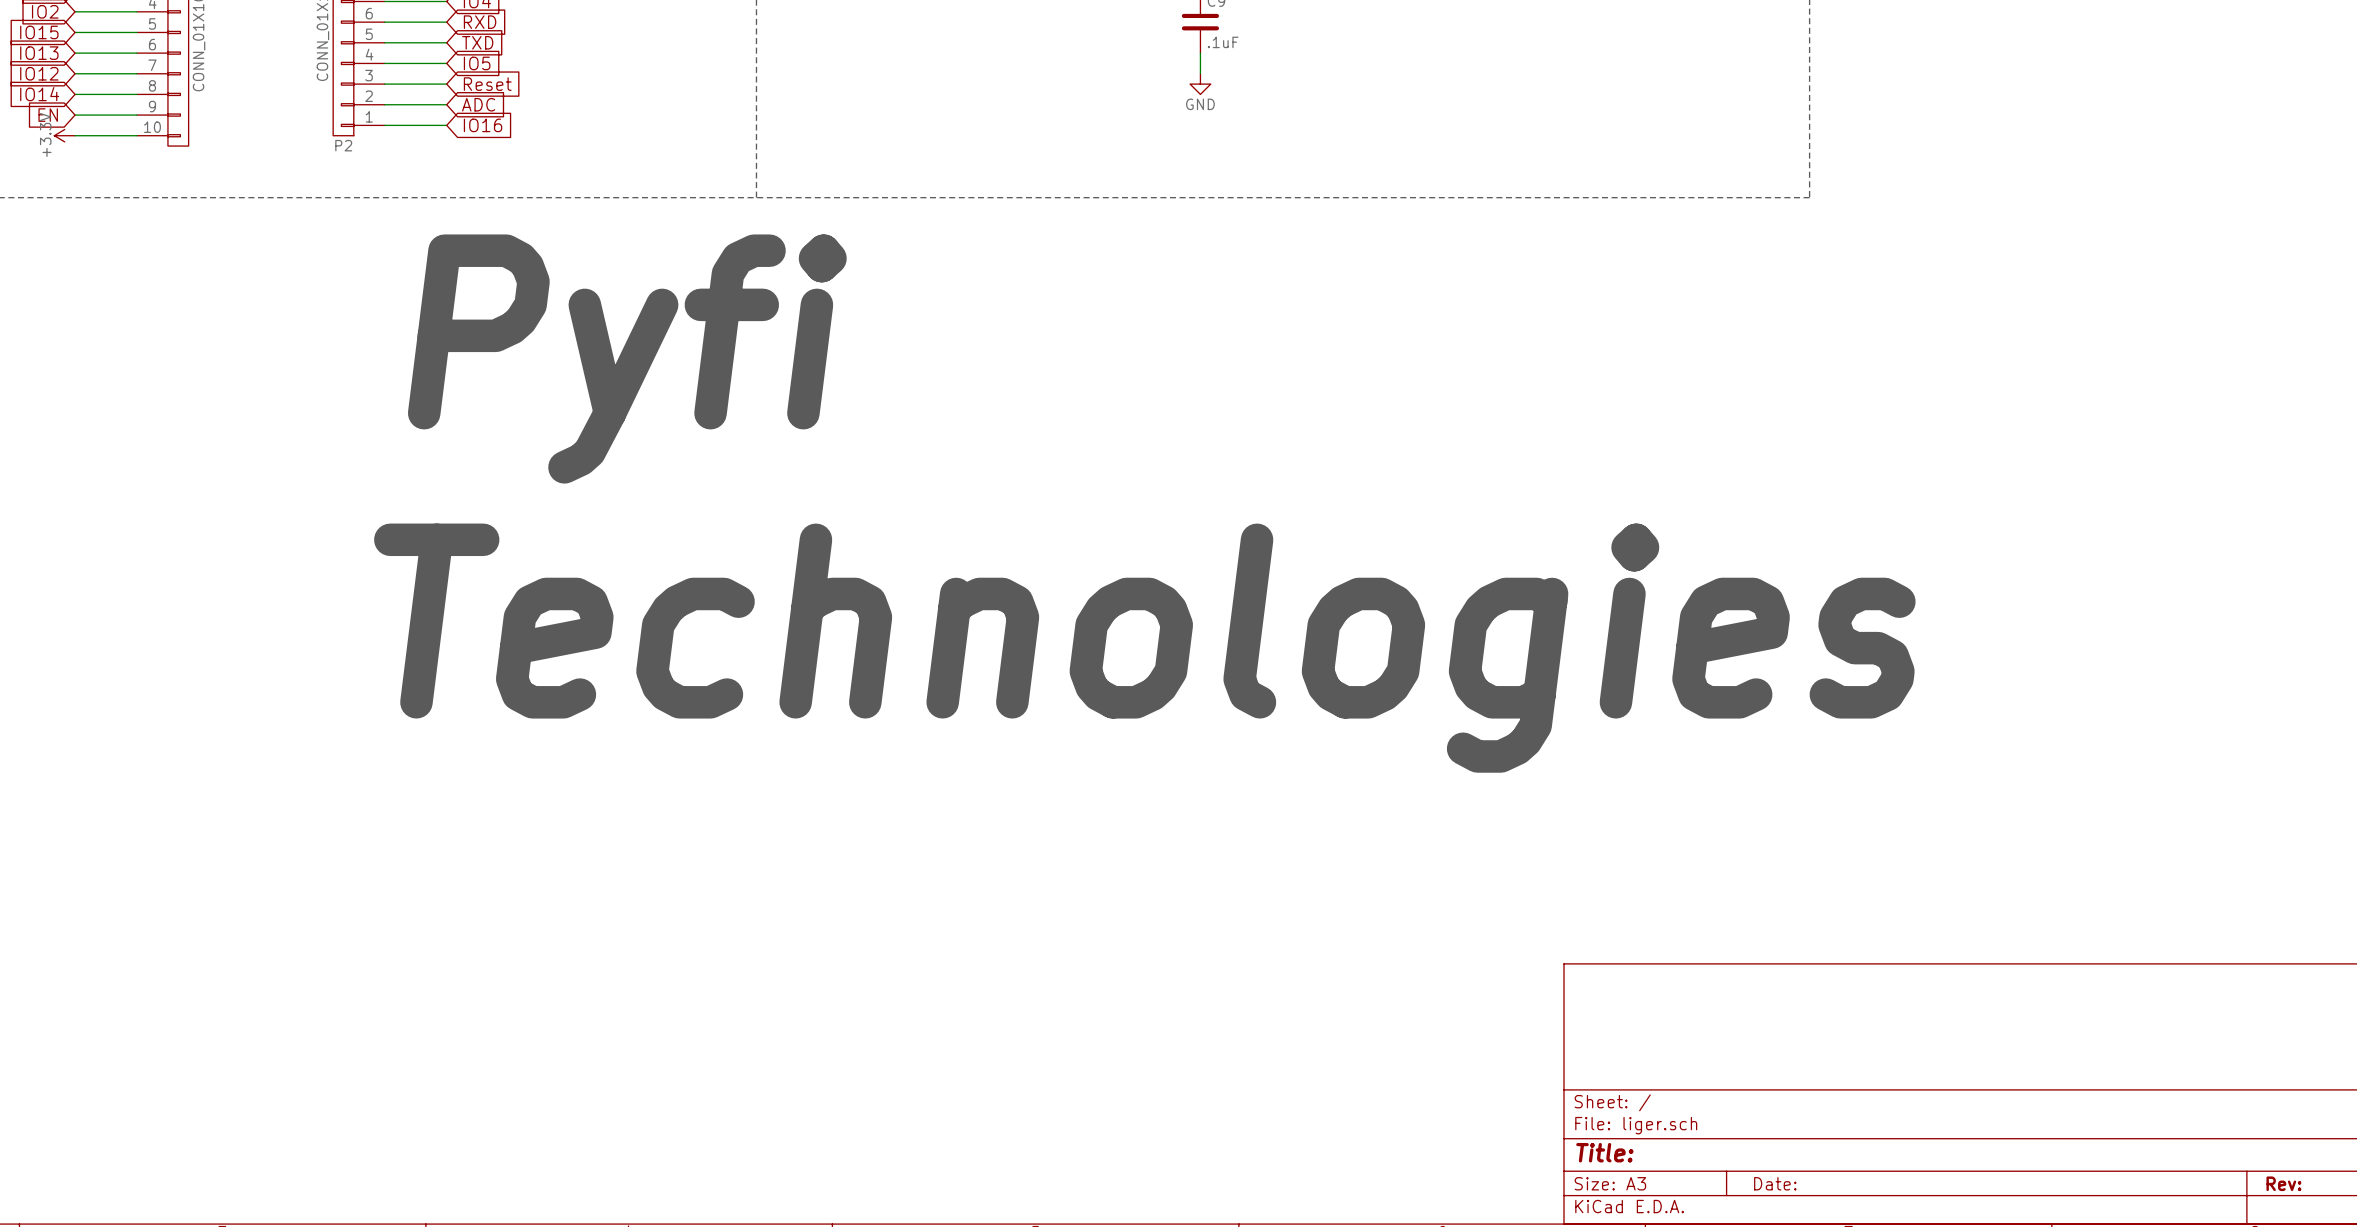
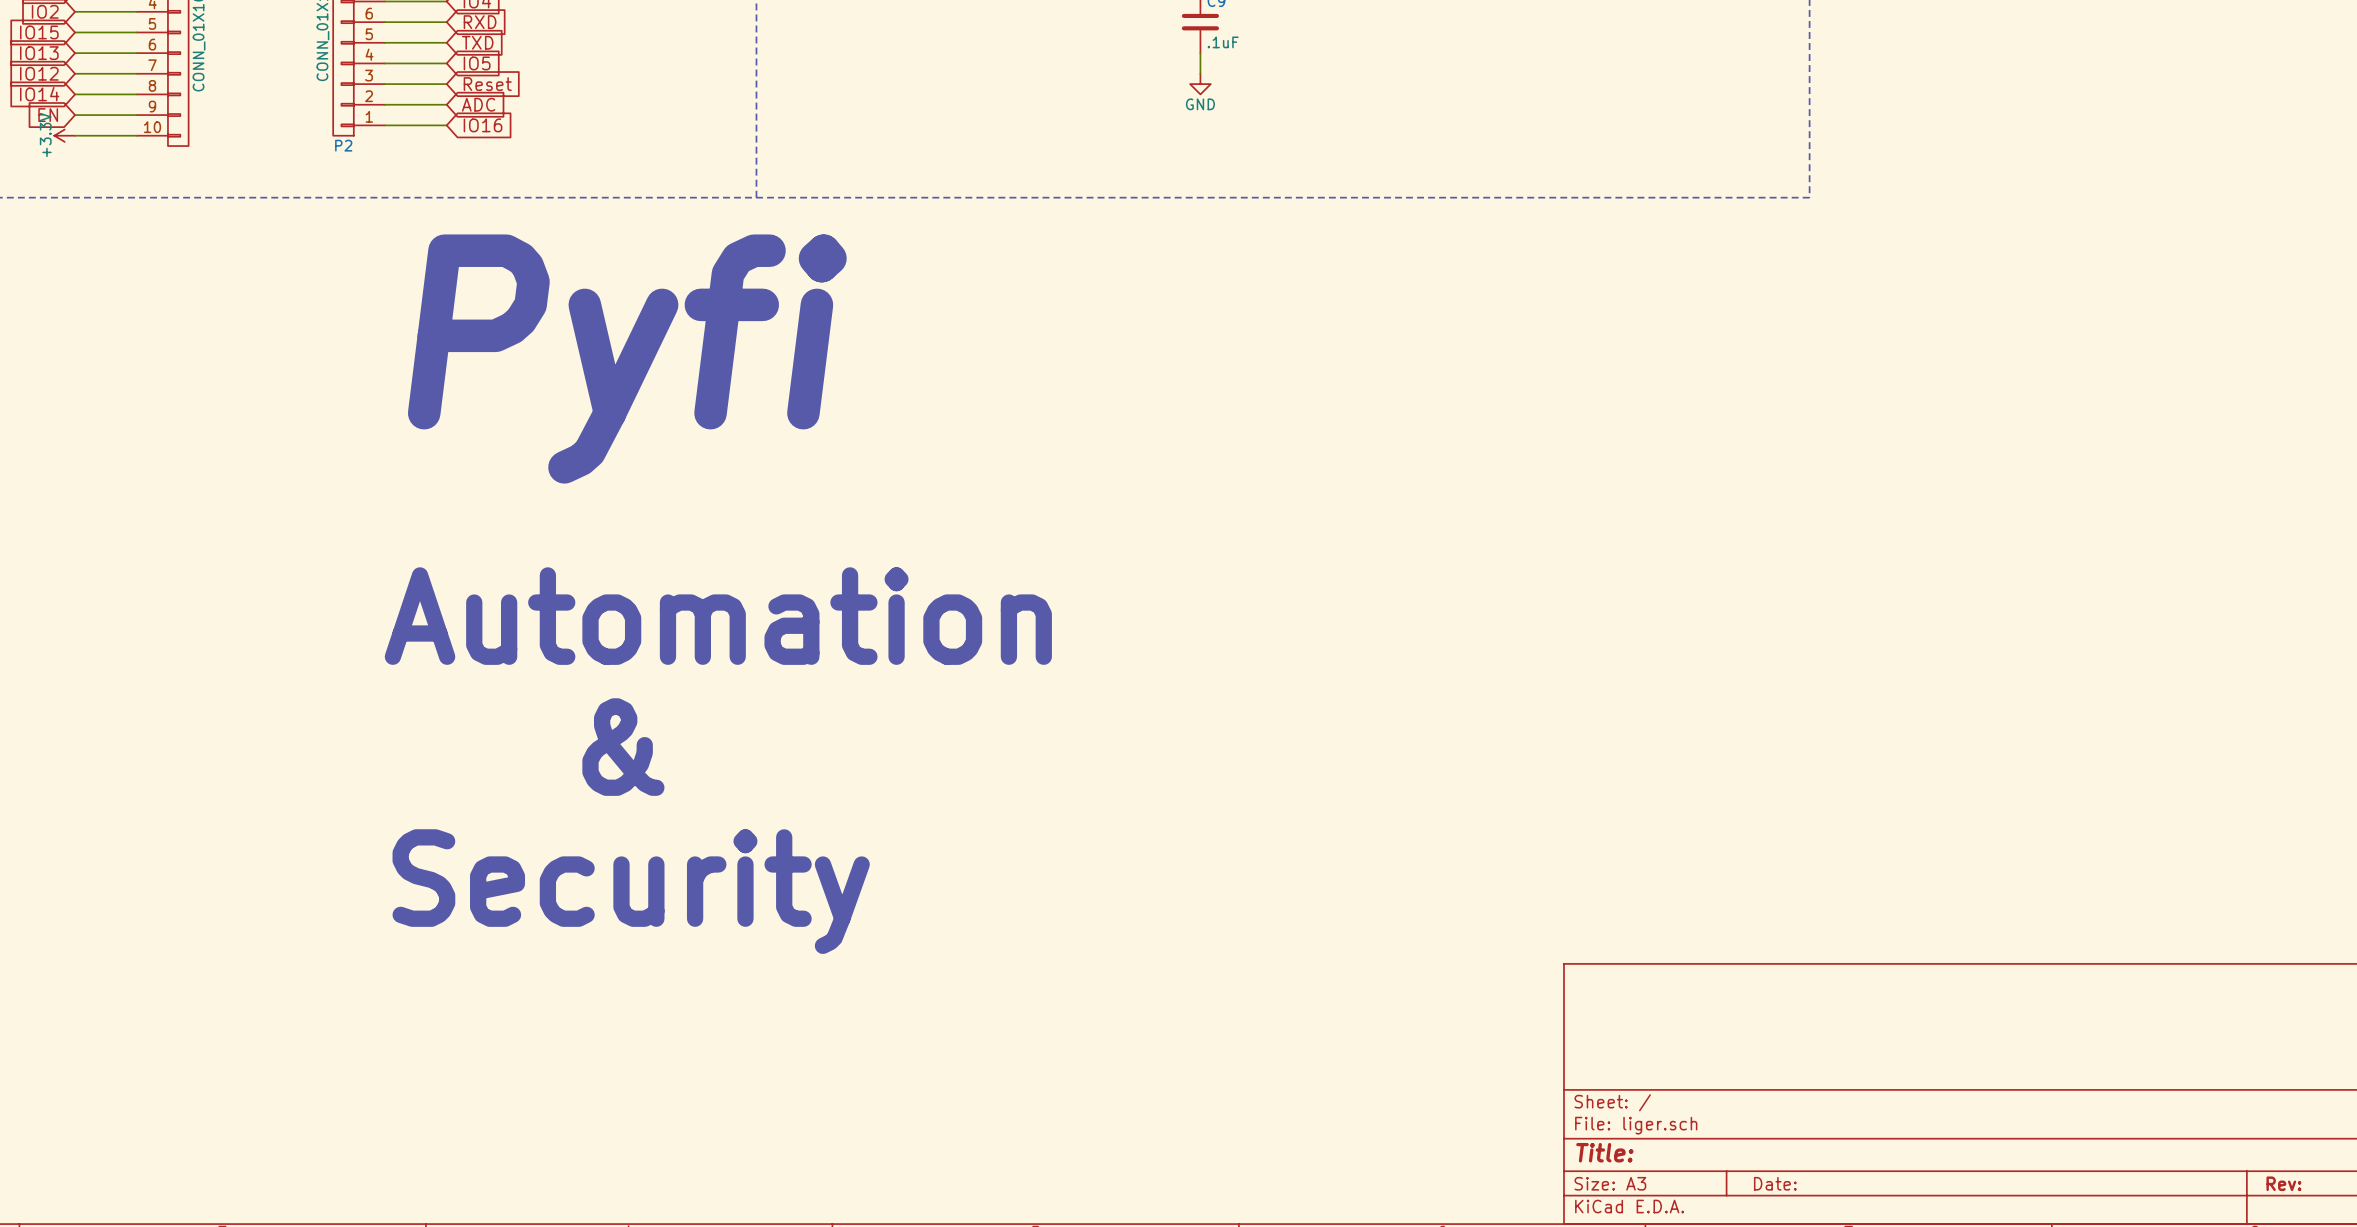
text: none -> Automation (718, 616)
text: Technologies (1144, 648) -> none
text: none -> & (623, 747)
text: none -> Security (631, 891)

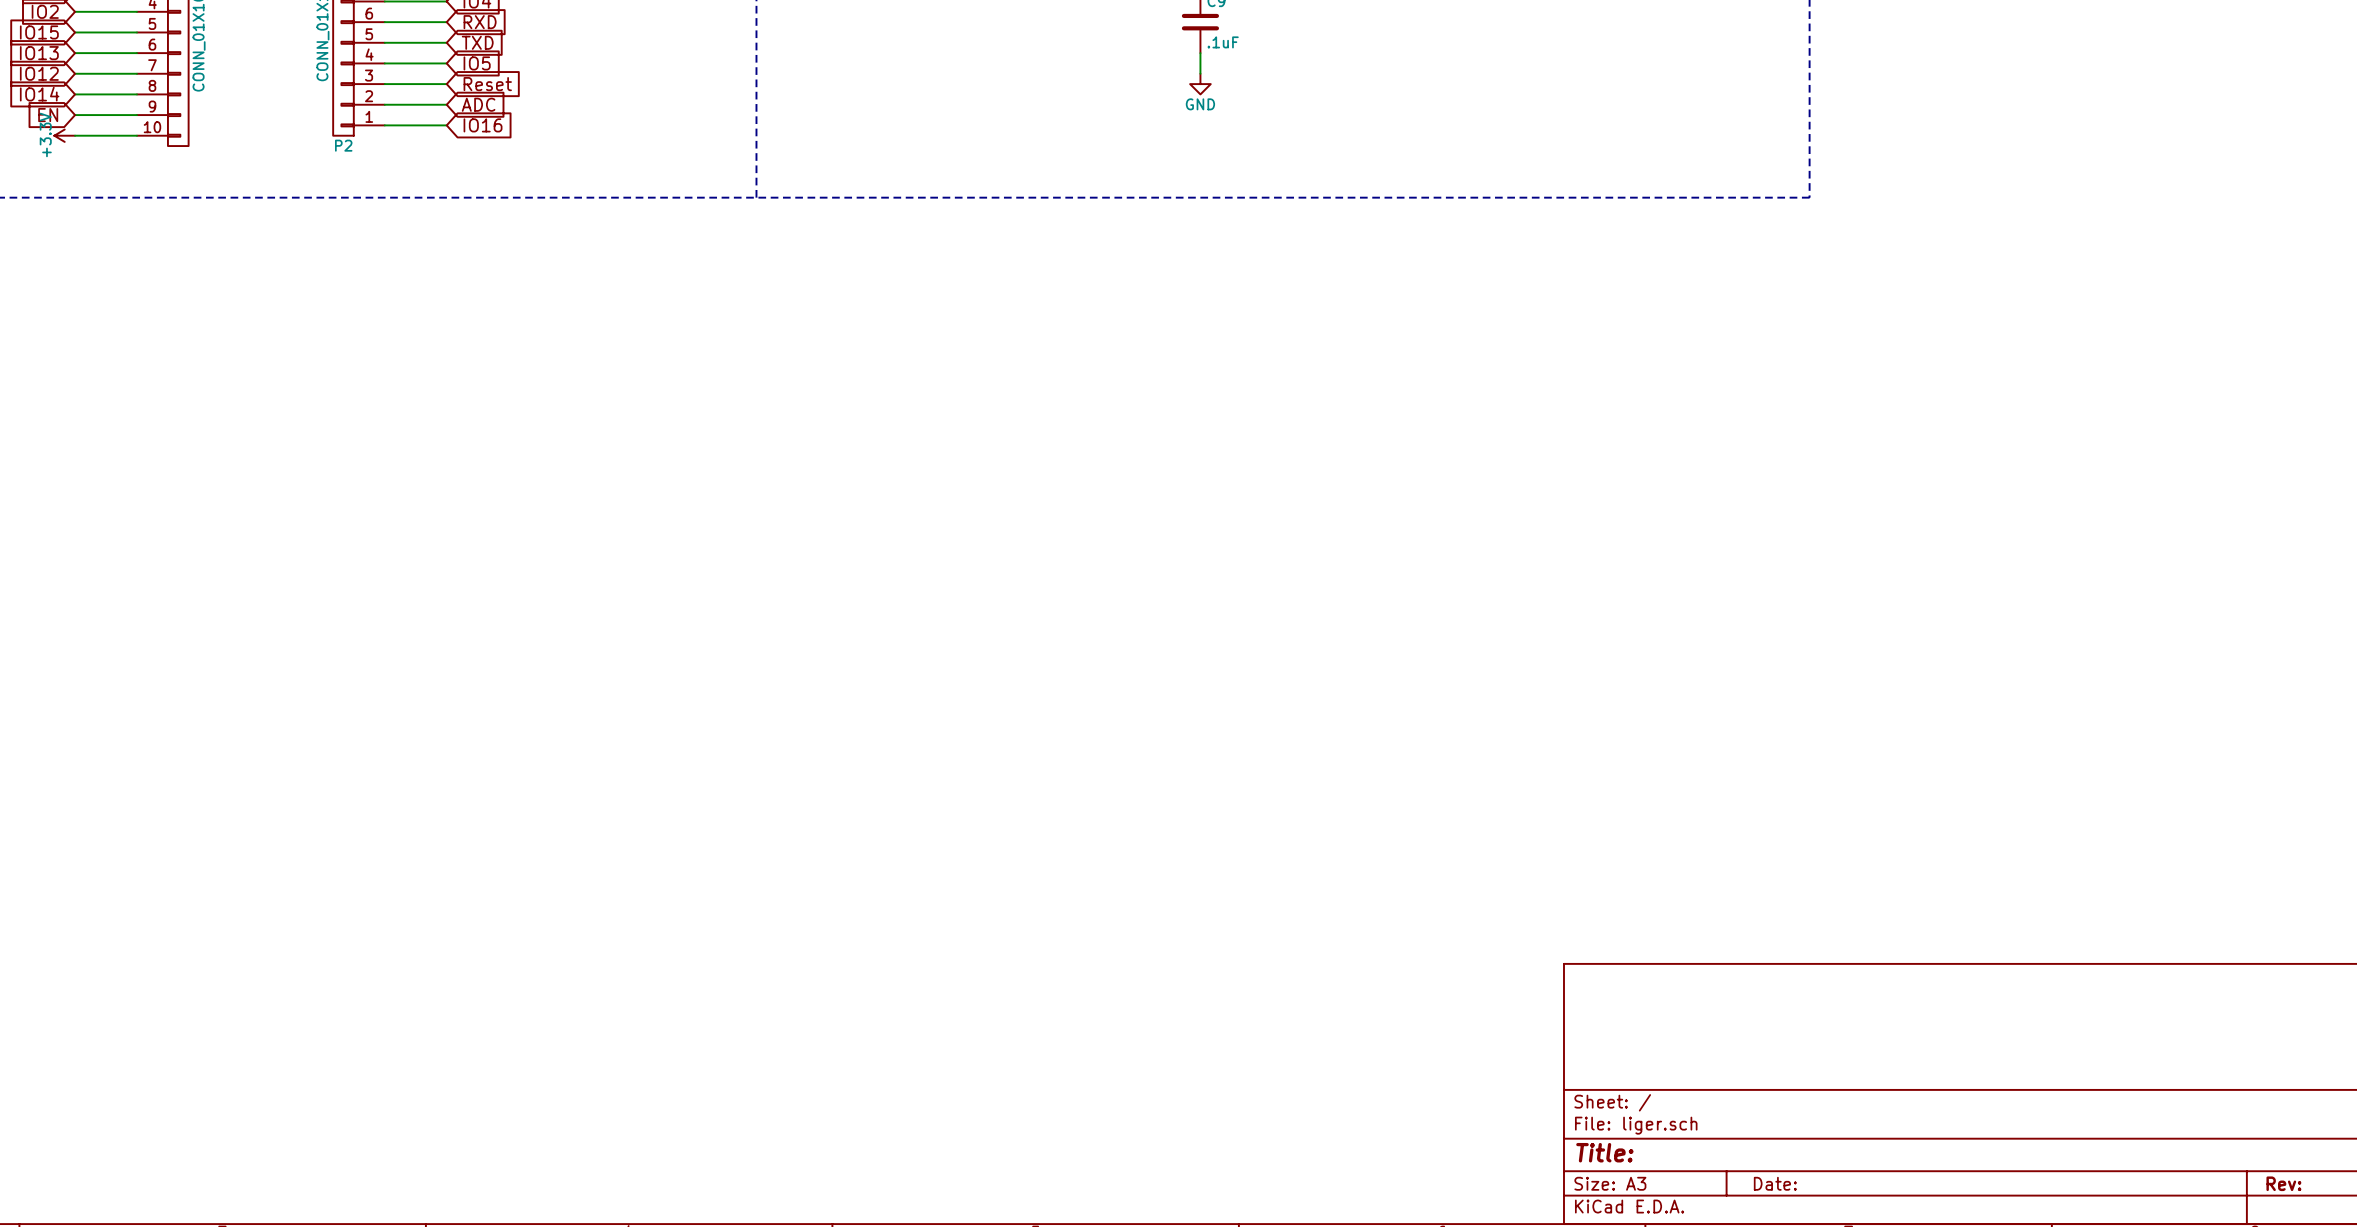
text: Pyfi (627, 359) -> none
text: Automation (718, 616) -> none
text: & (623, 747) -> none
text: Security (631, 891) -> none

